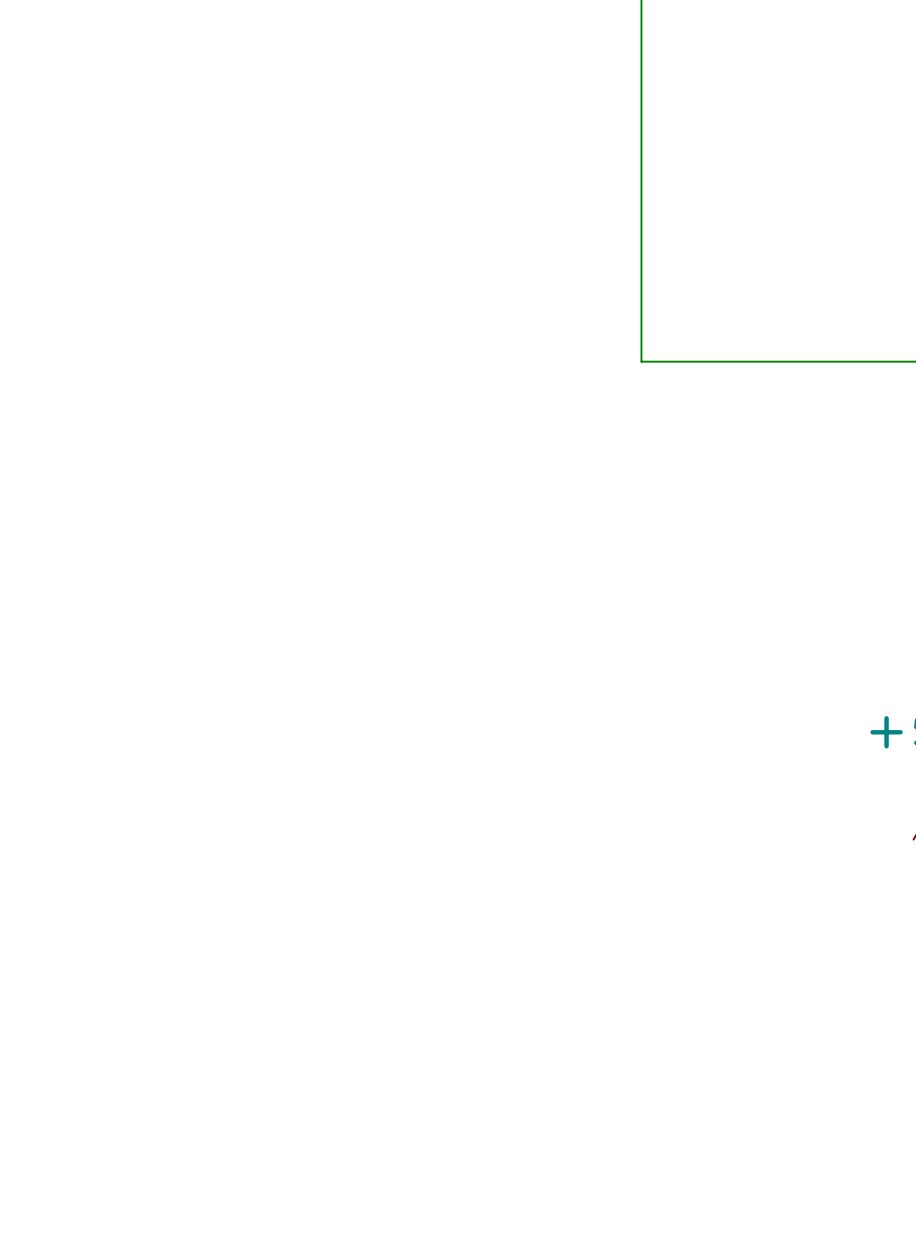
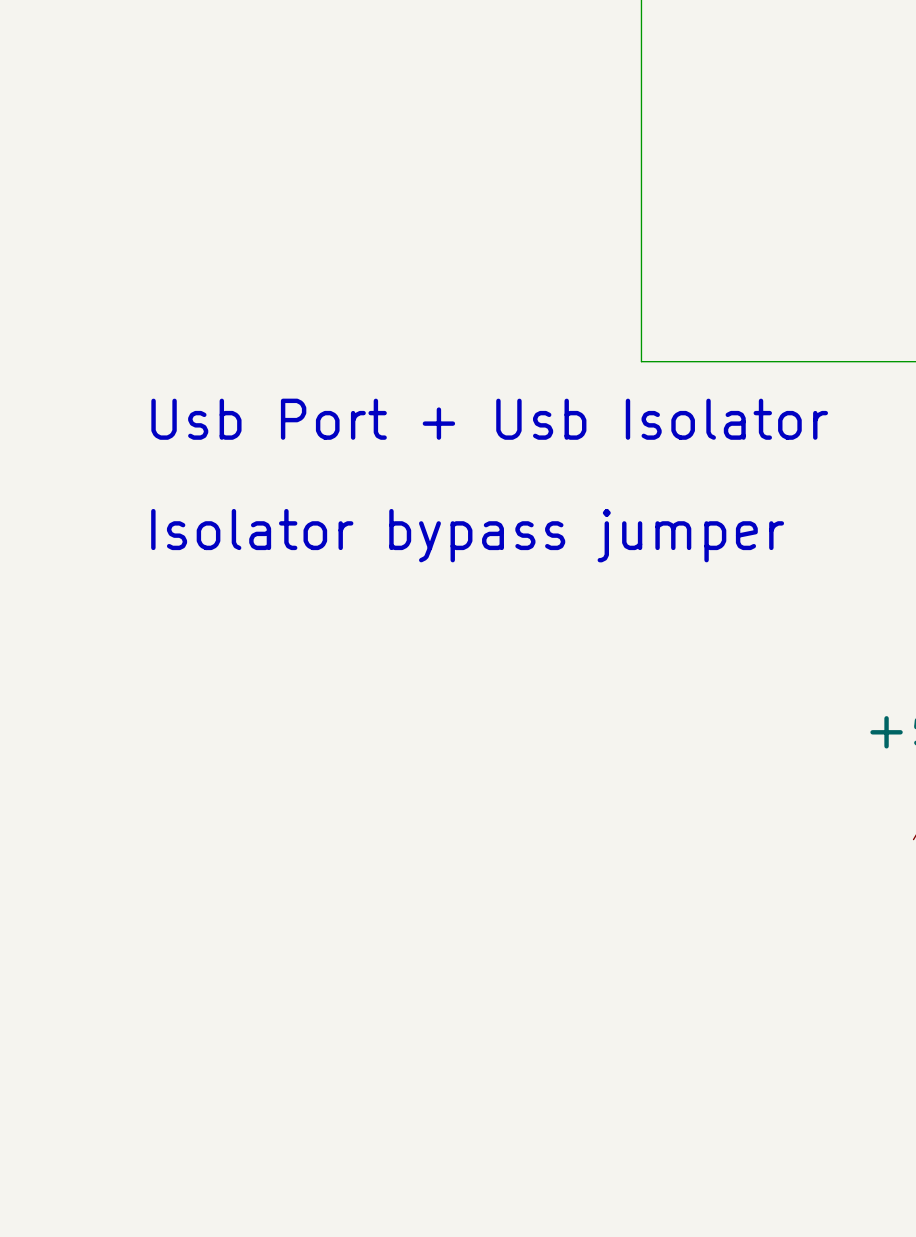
text: none -> Usb Port + Usb Isolator (489, 419)
text: none -> Isolator bypass jumper (467, 535)

